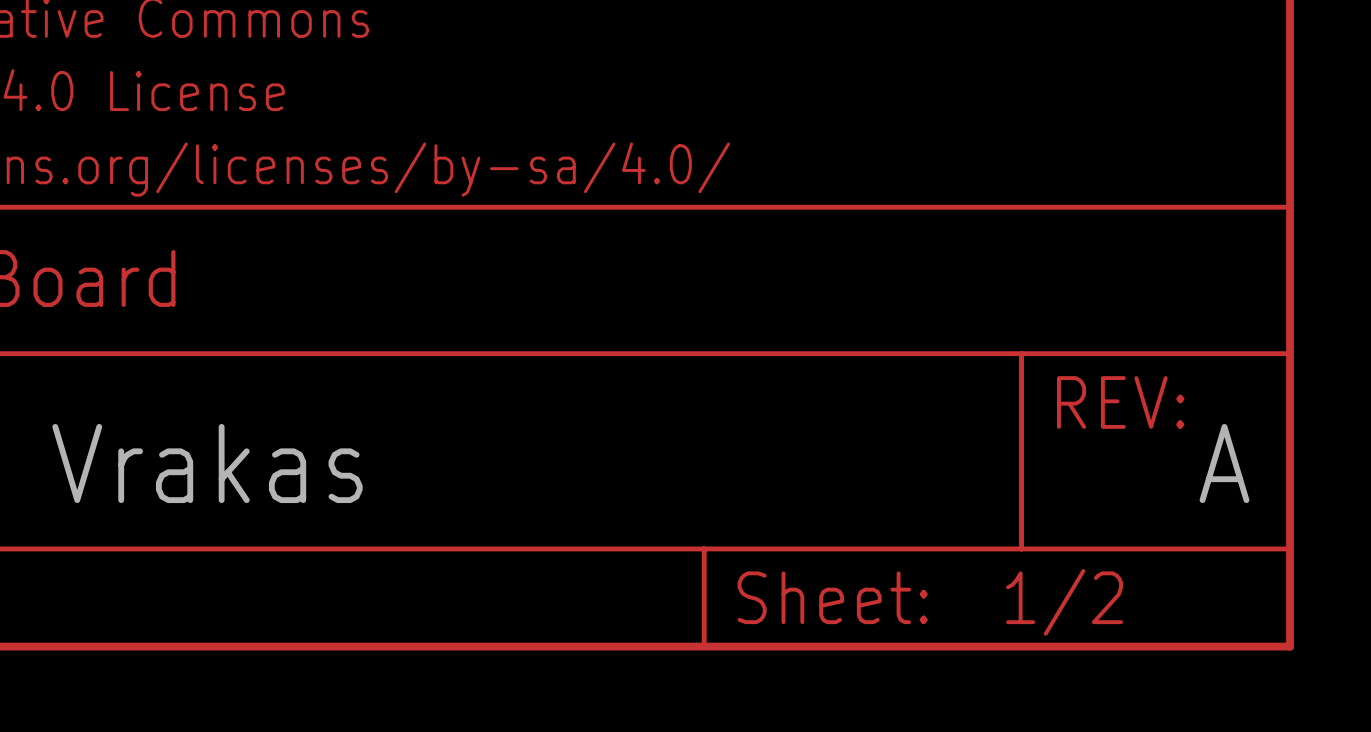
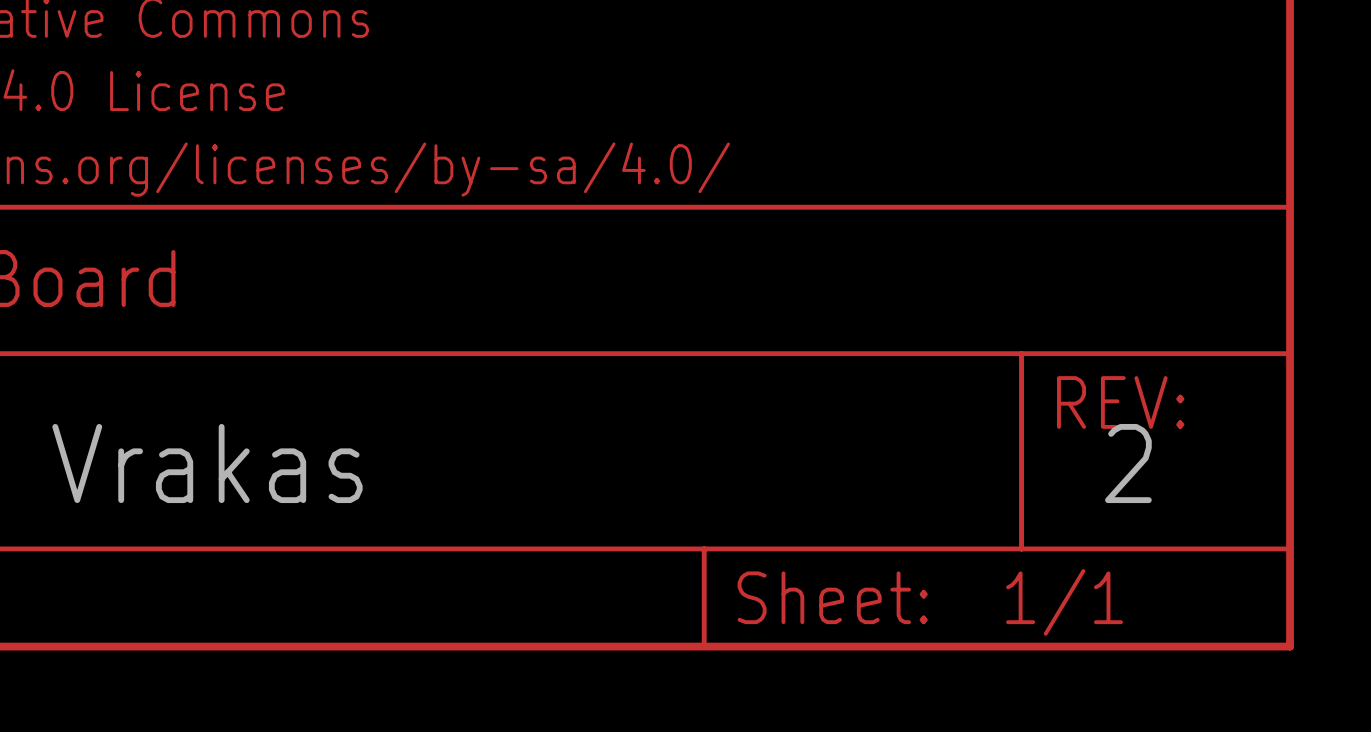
part text: A (1224, 463) -> 2 (1128, 463)
part text: 1/2 (1064, 602) -> 1/1 (1064, 602)

